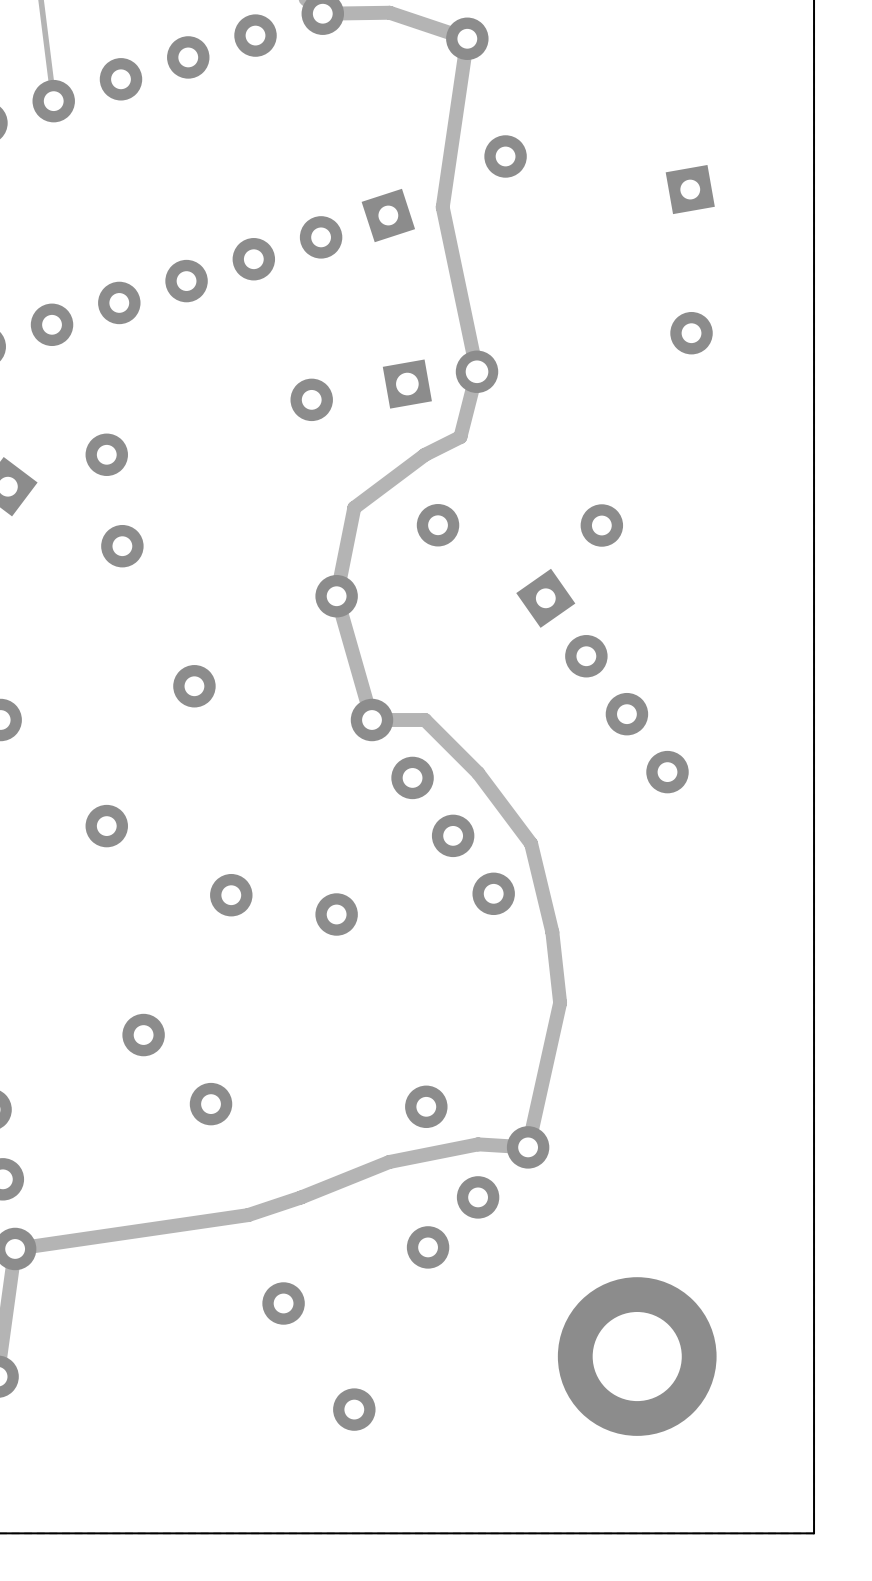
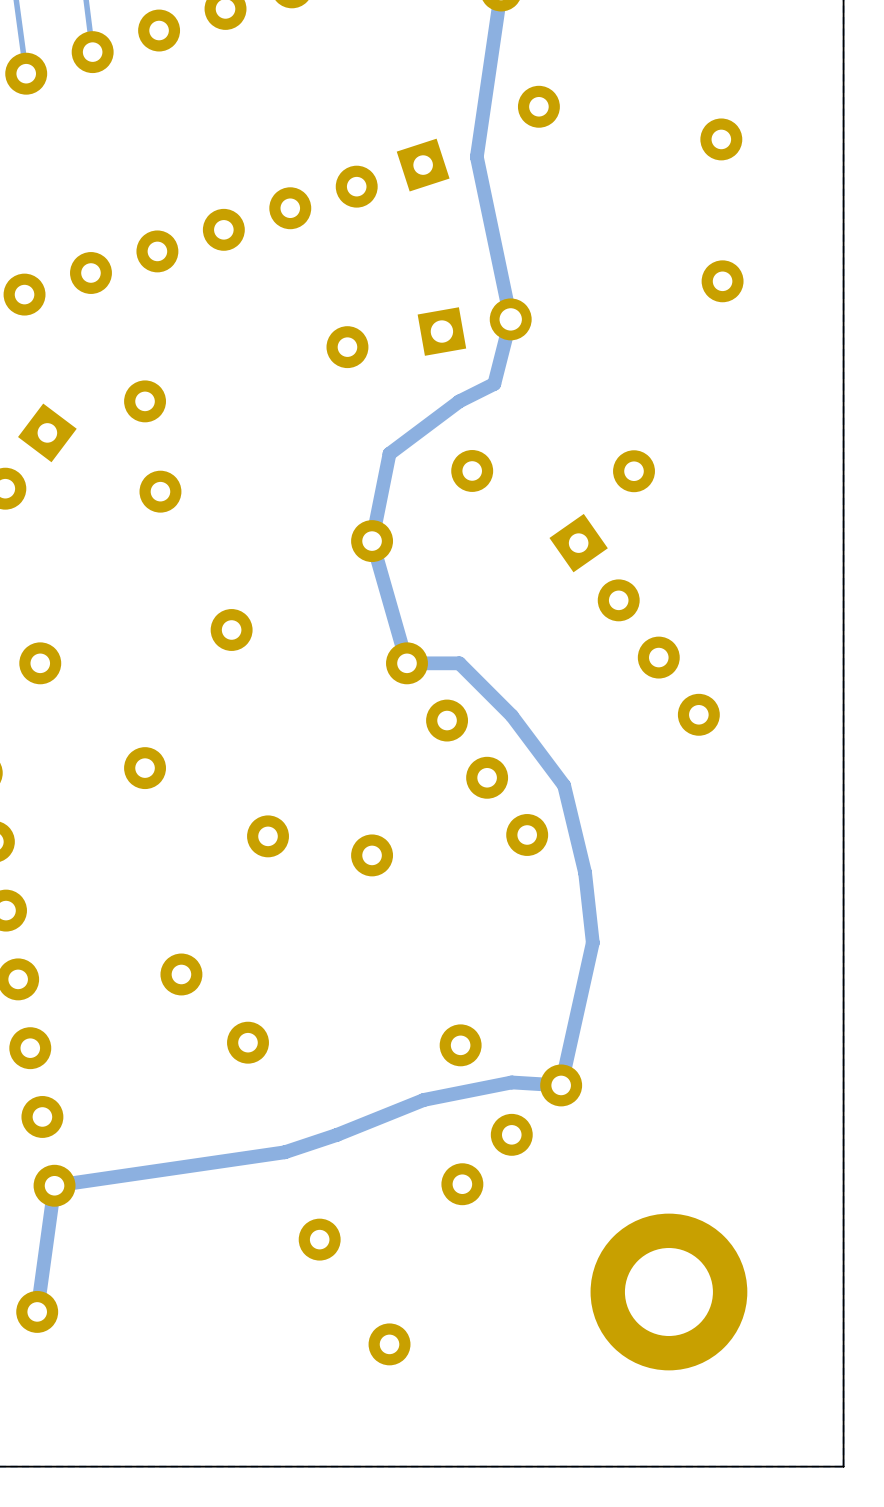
part footprint: [665, 164, 715, 215] -> [700, 118, 743, 161]

